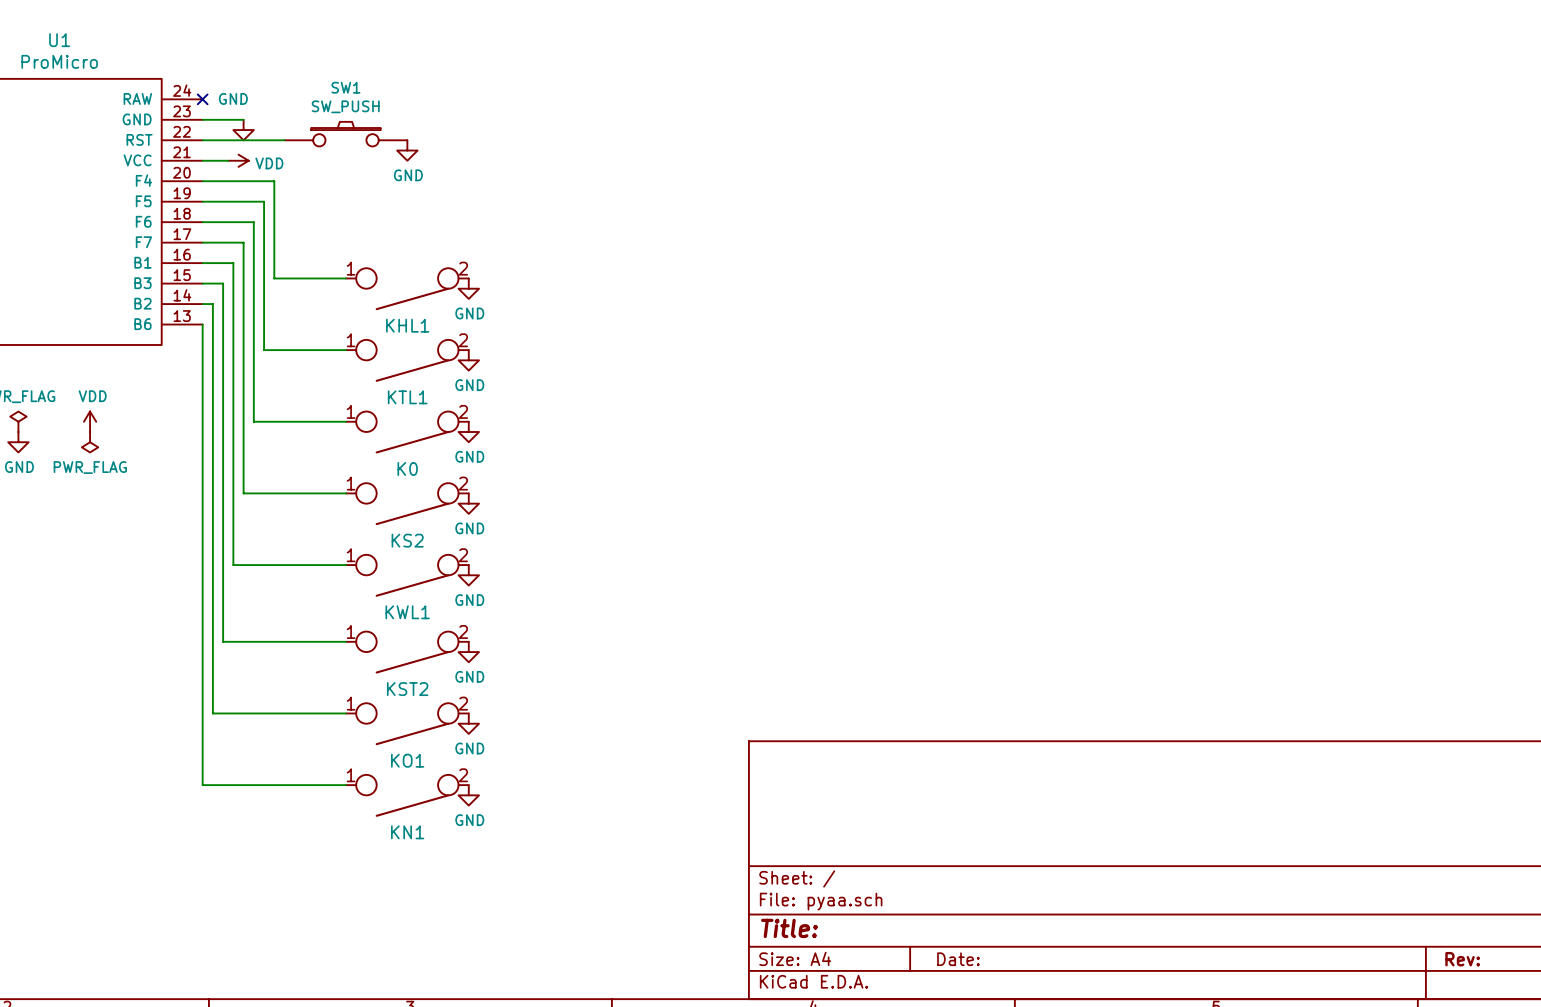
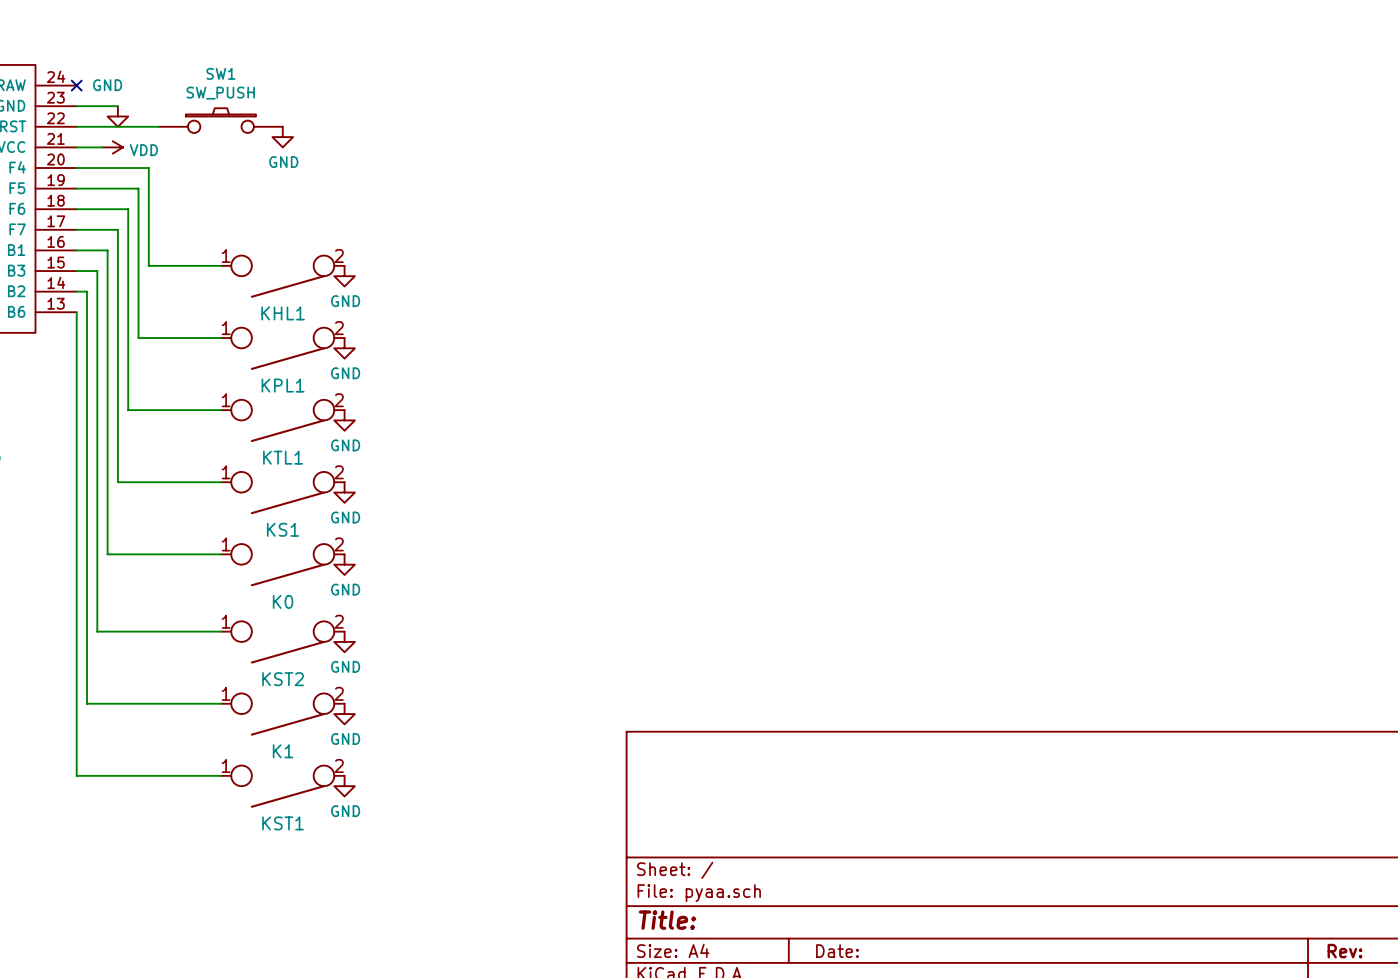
KTL1 name: KTL1 (407, 397) -> KPL1 (283, 385)
K0 name: K0 (407, 469) -> KTL1 (283, 457)
KS2 name: KS2 (407, 540) -> KS1 (283, 529)
KWL1 name: KWL1 (407, 612) -> K0 (283, 601)
KO1 name: KO1 (407, 760) -> K1 (283, 751)
KN1 name: KN1 (407, 832) -> KST1 (283, 823)

